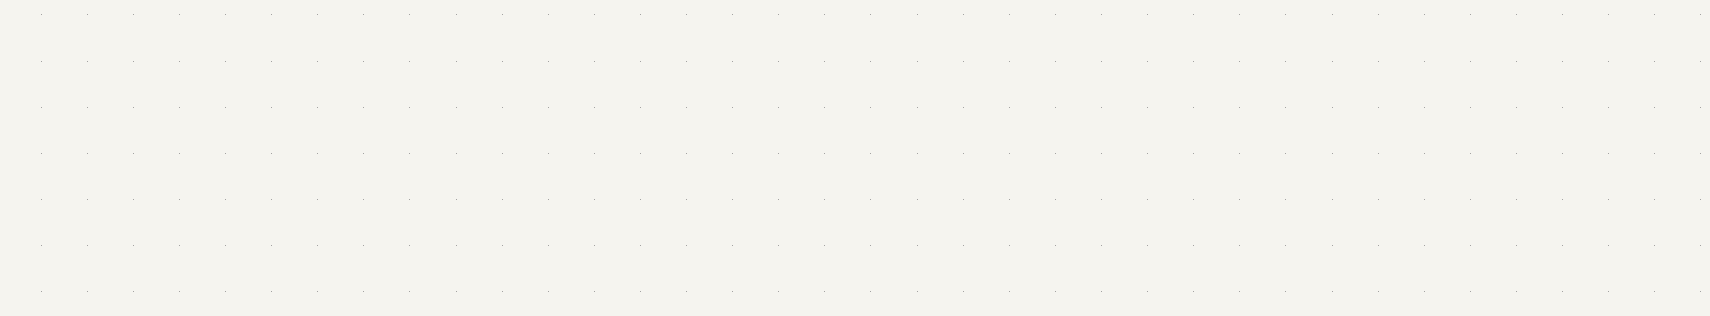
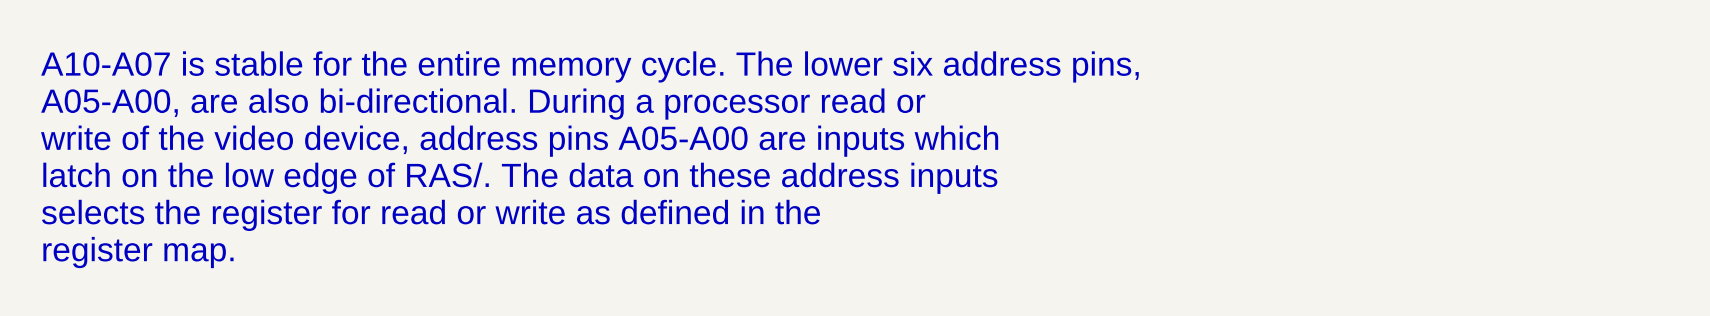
text: none -> A10-A07 is stable for the entire memory cycle. The lower six address pins, (589, 66)
text: none -> A05-A00, are also bi-directional. During a processor read or (483, 104)
text: none -> write of the video device, address pins A05-A00 are inputs which (519, 141)
text: none -> latch on the low edge of RAS/. The data on these address inputs (520, 178)
text: none -> selects the register for read or write as defined in the (431, 215)
text: none -> register map. (138, 252)

